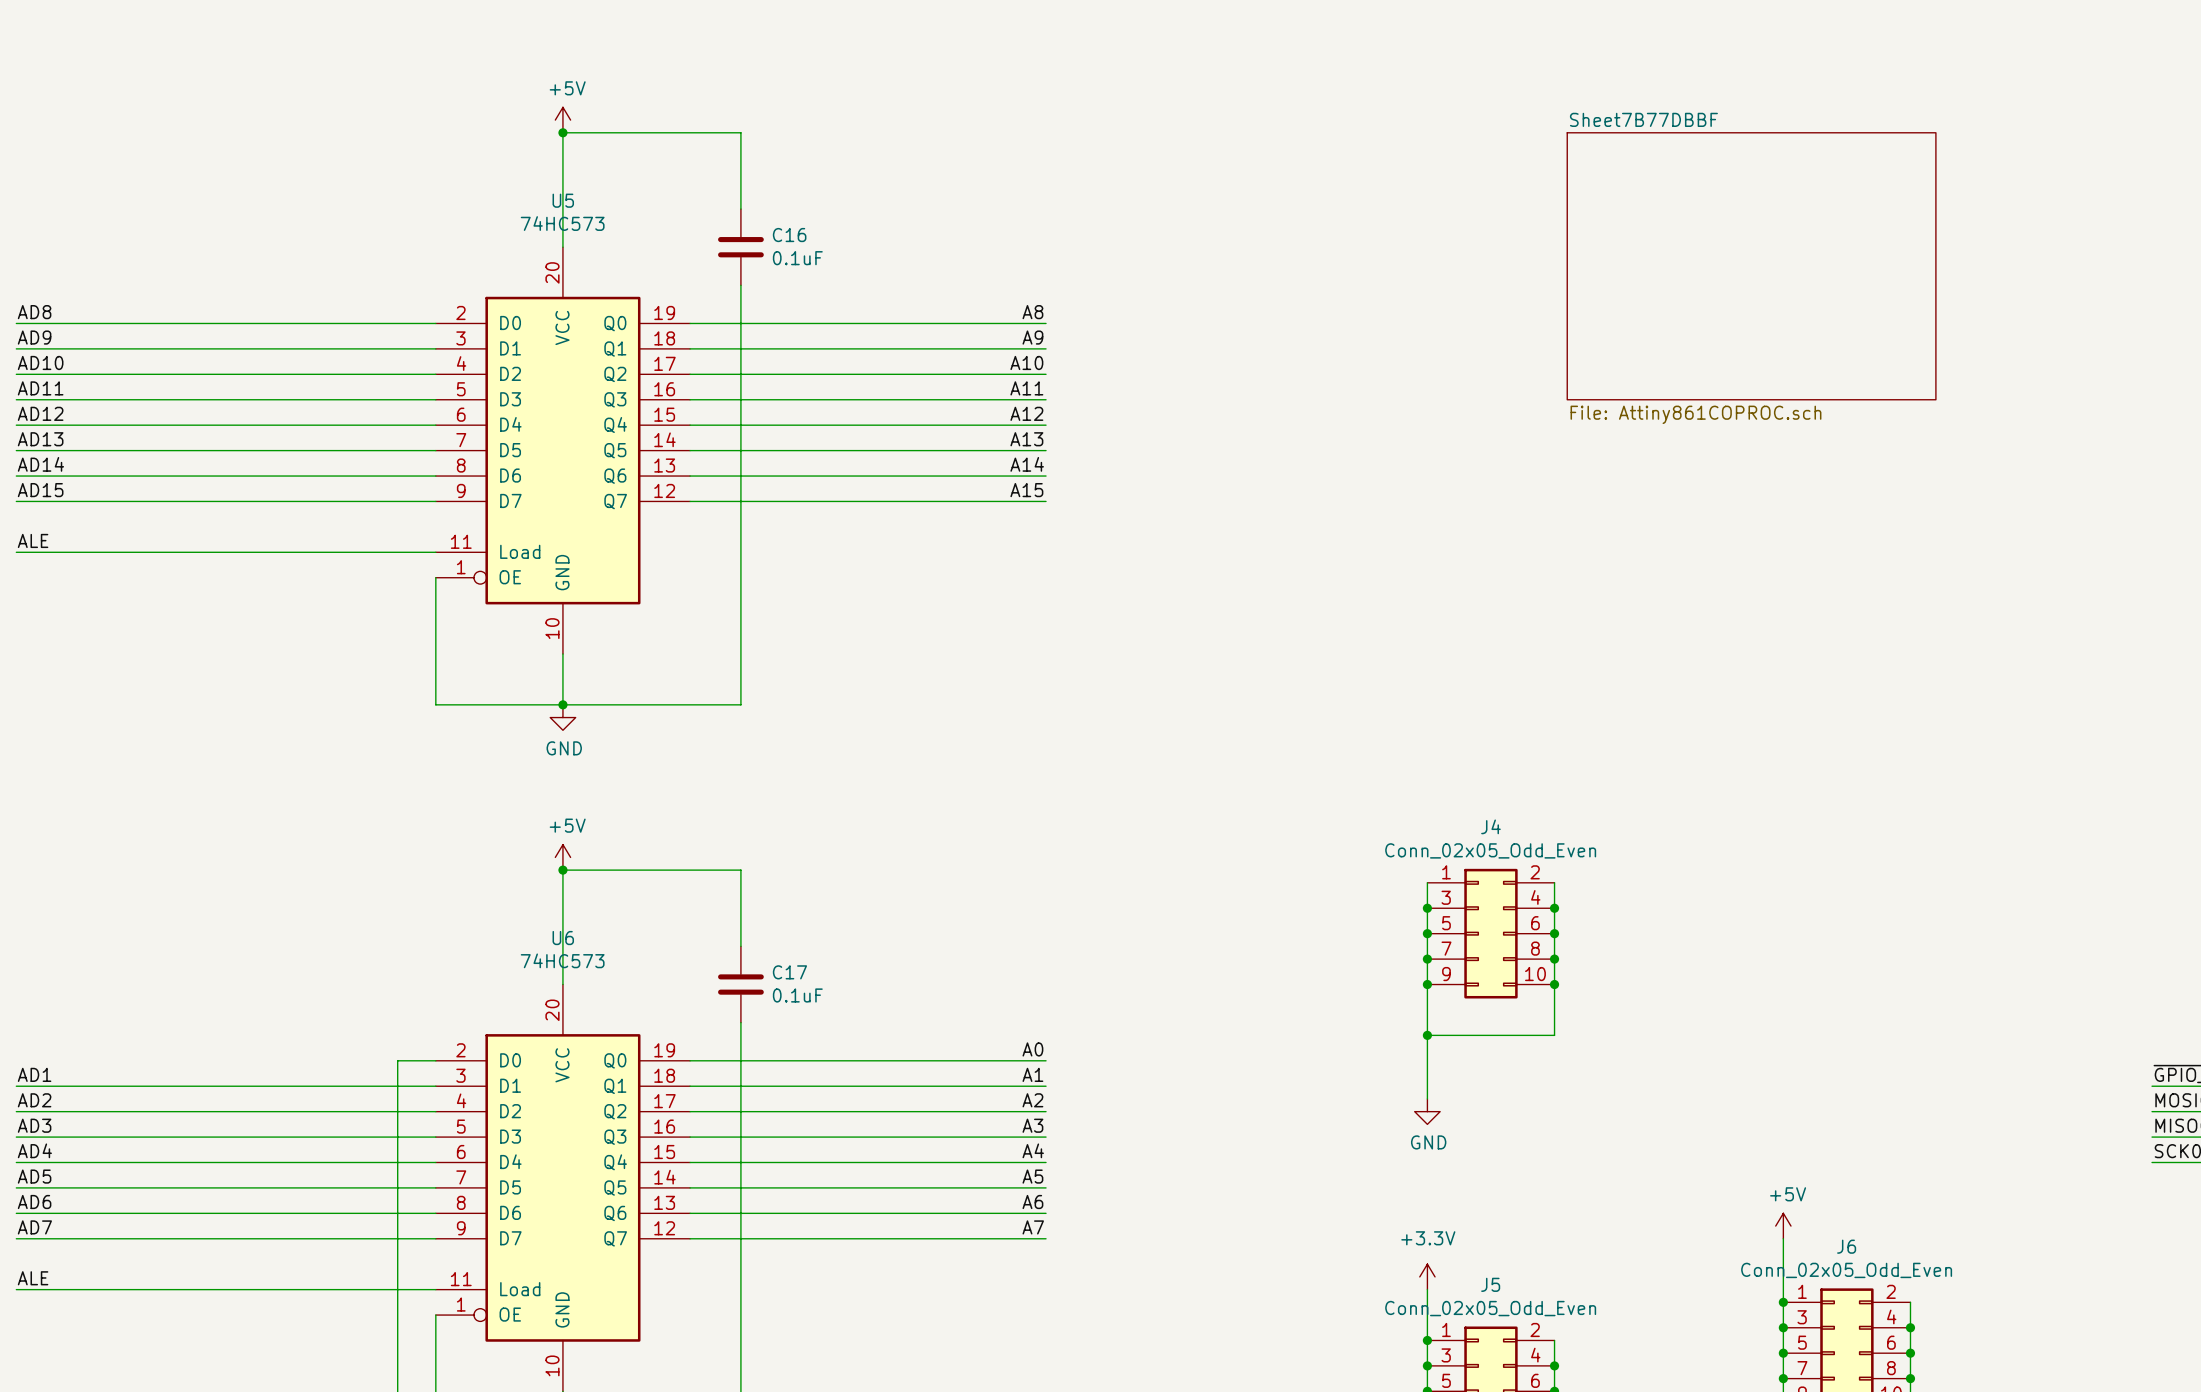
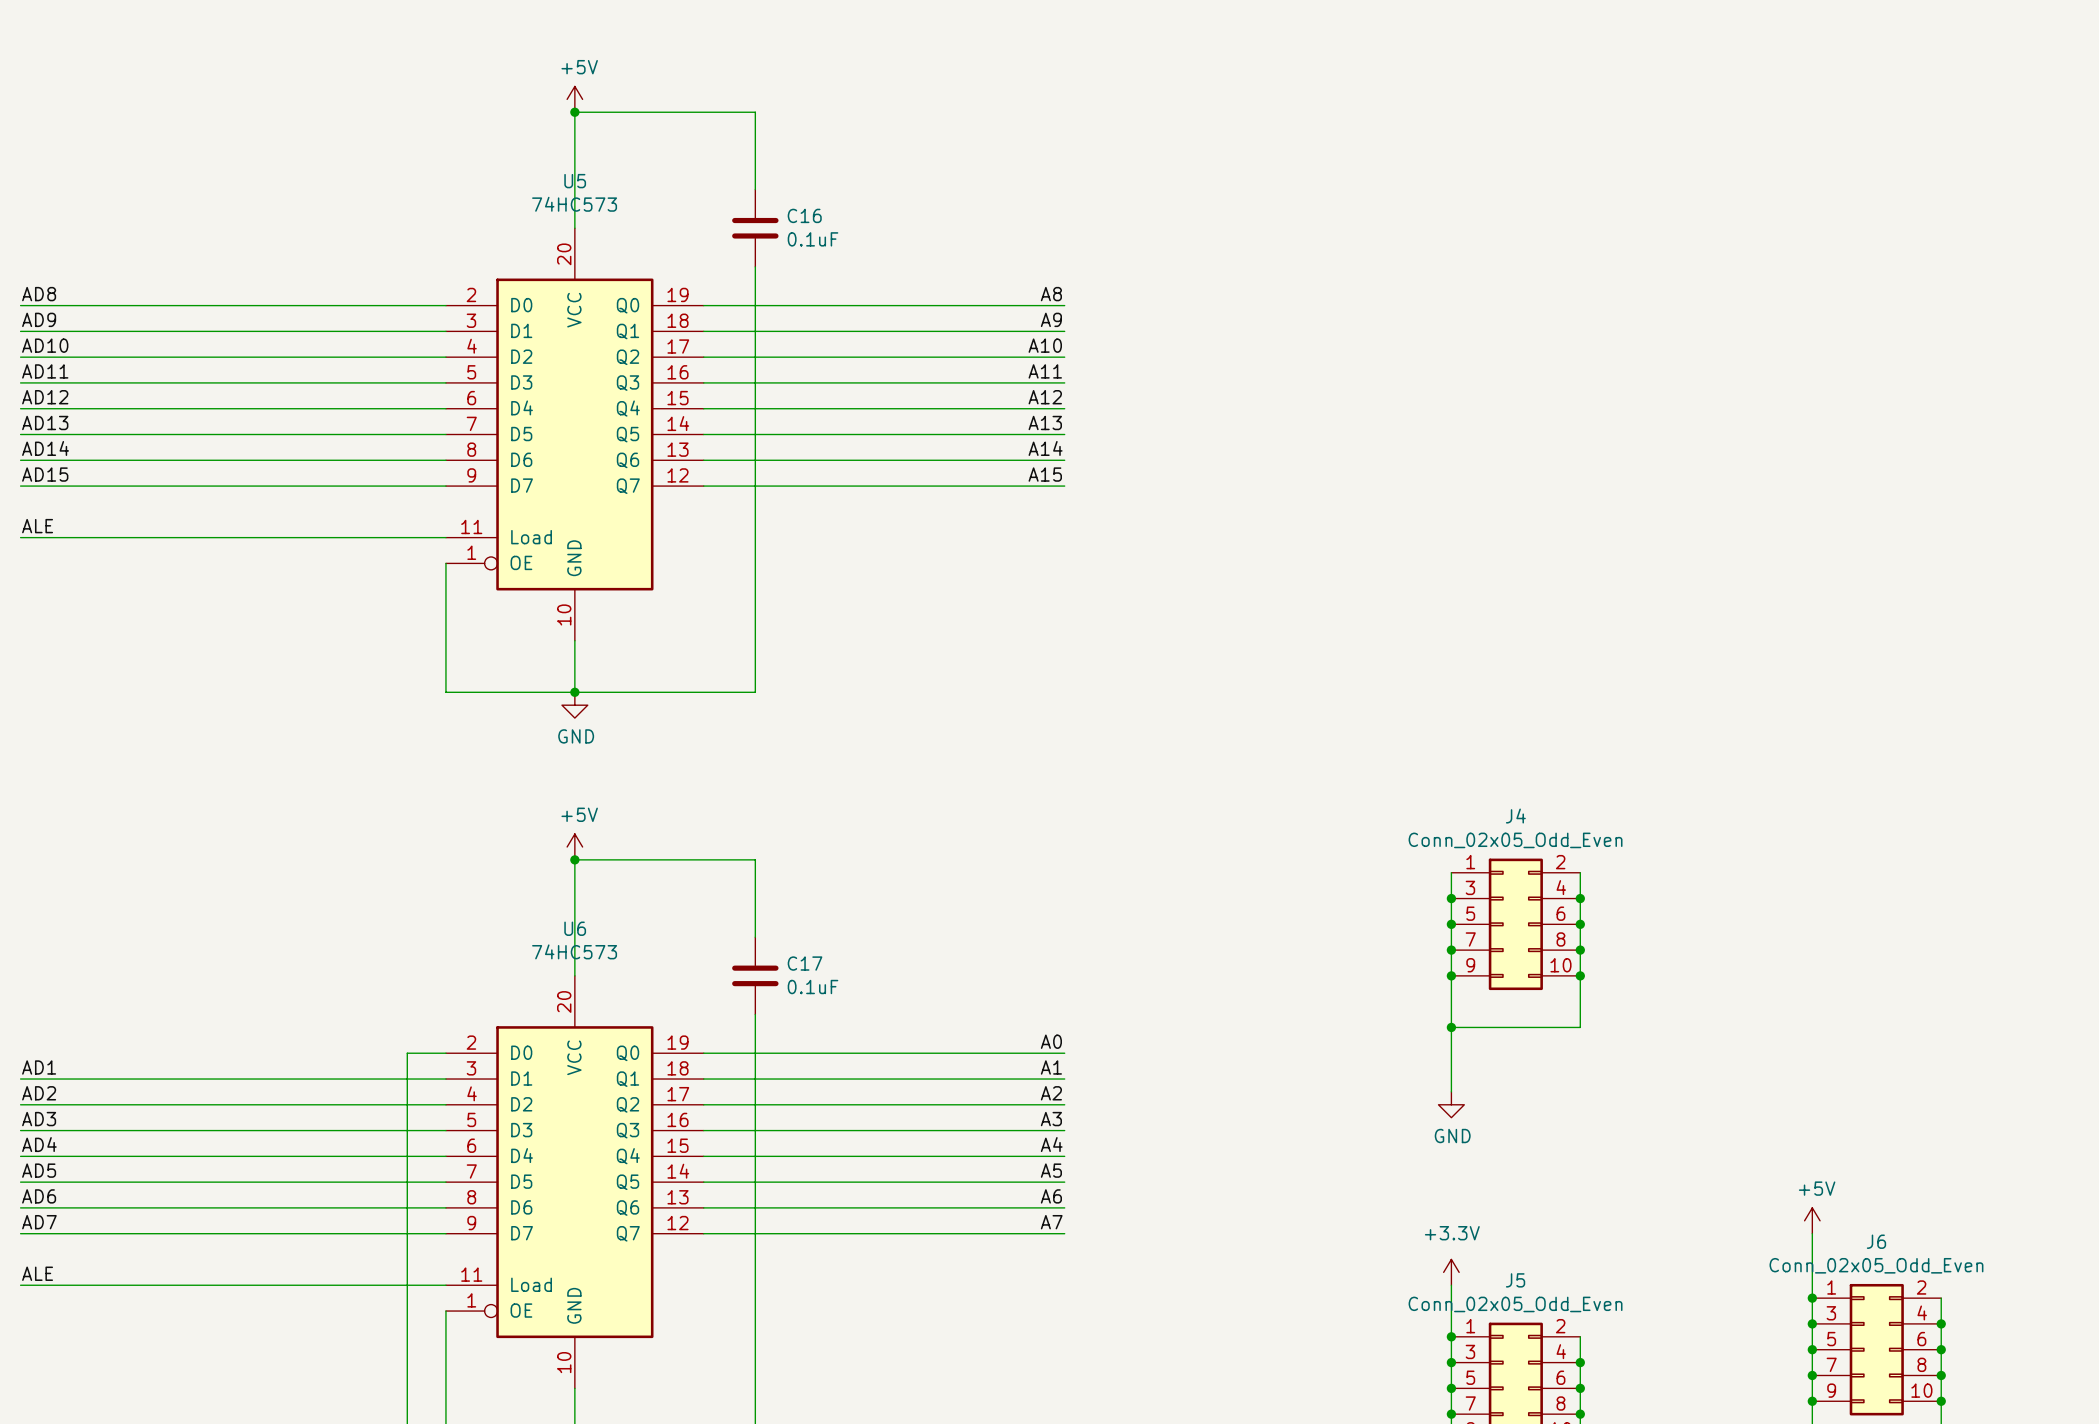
sheet Sheet7B77DBBF: File: Attiny861COPROC.sch (1751, 266) -> none

